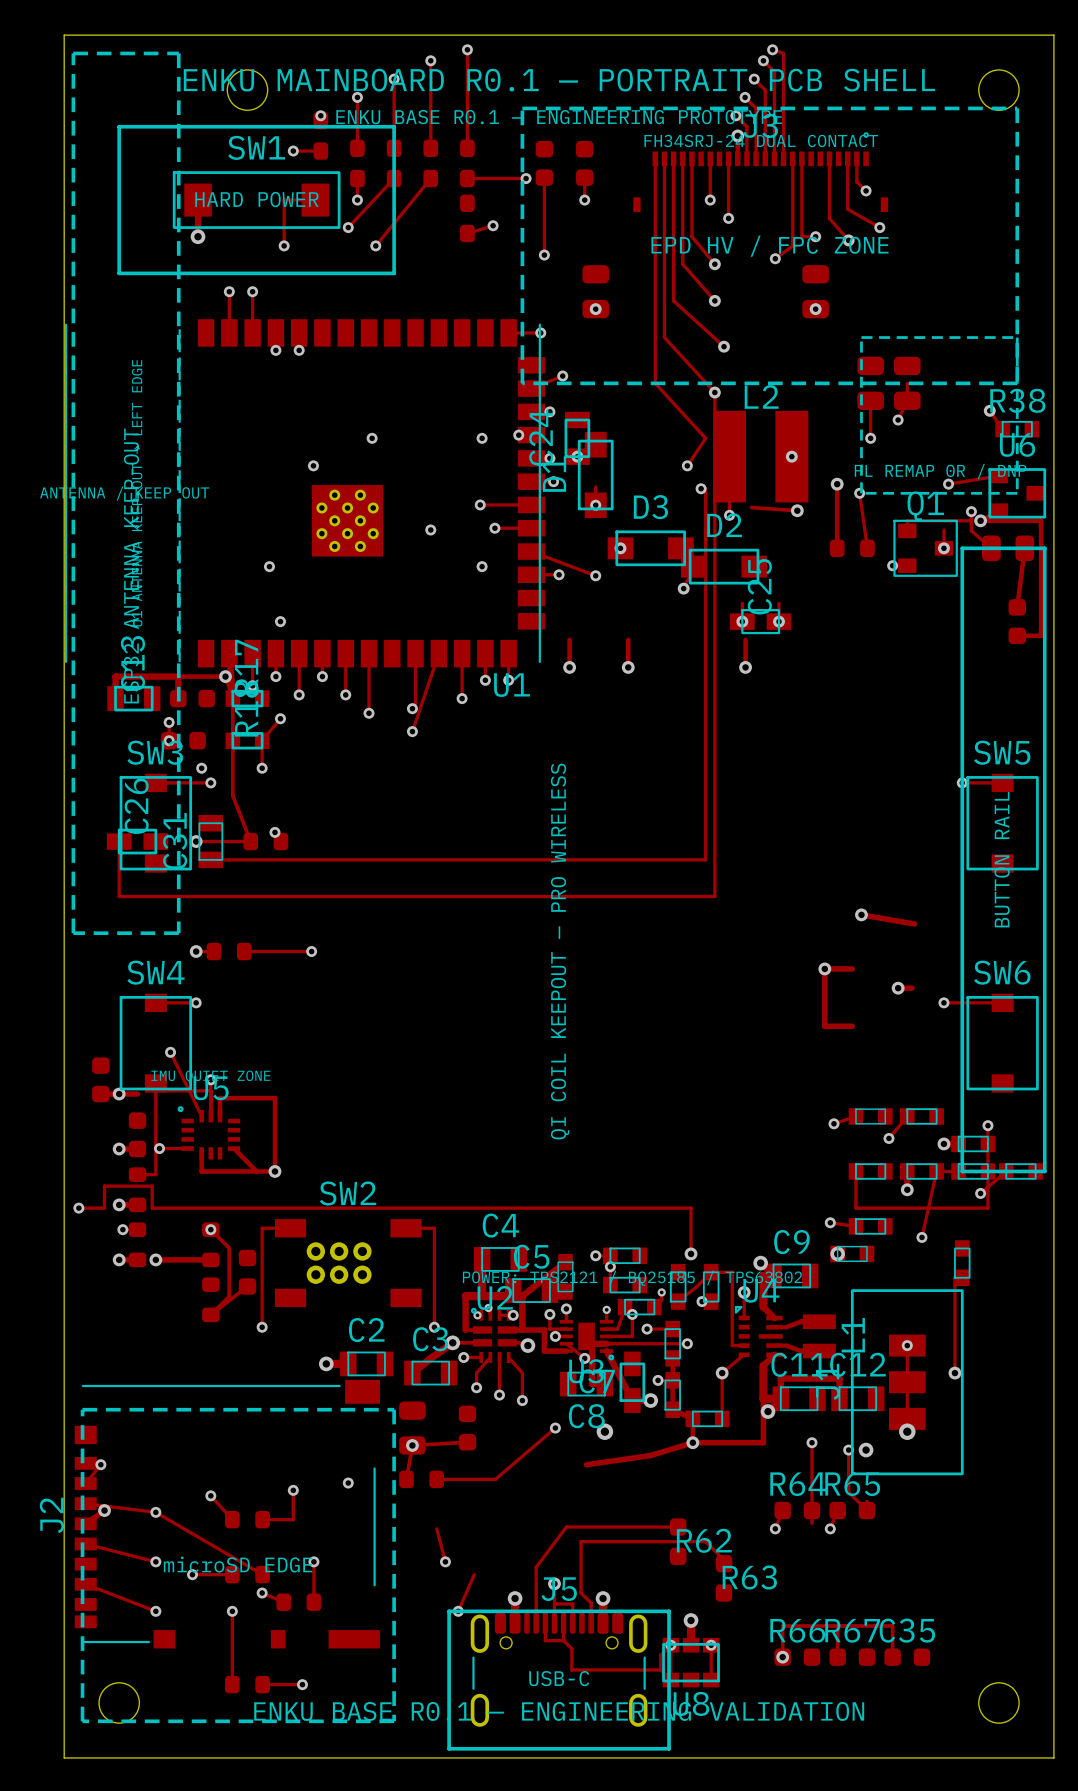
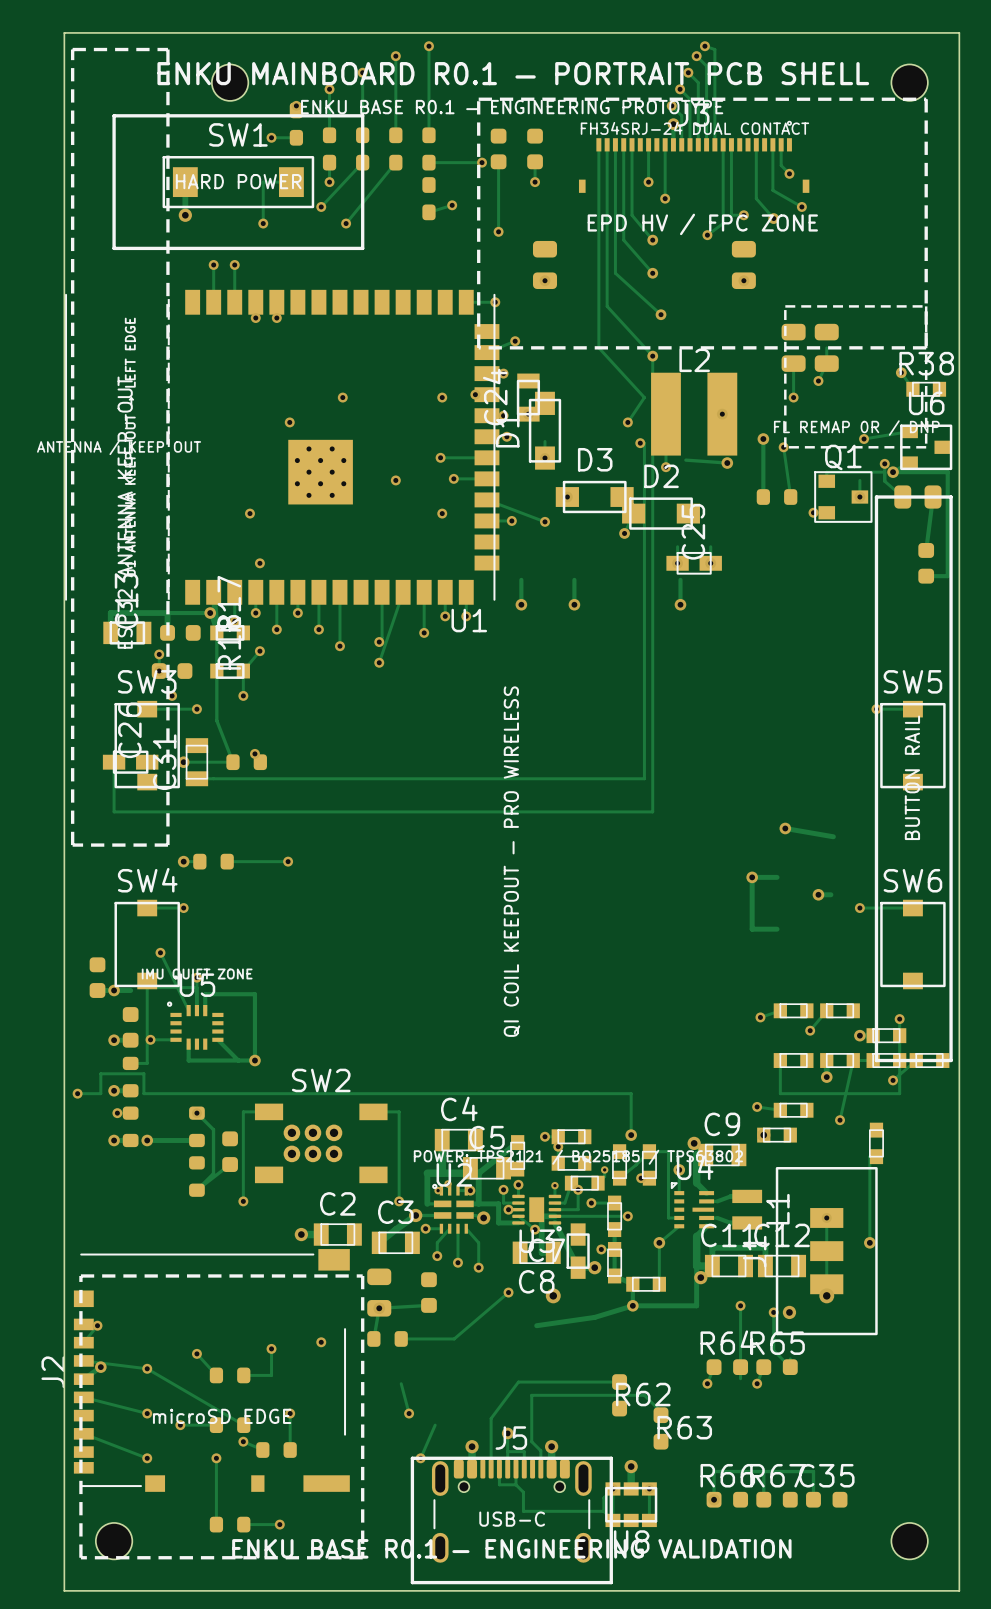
via position: (201, 768) -> (172, 695)

